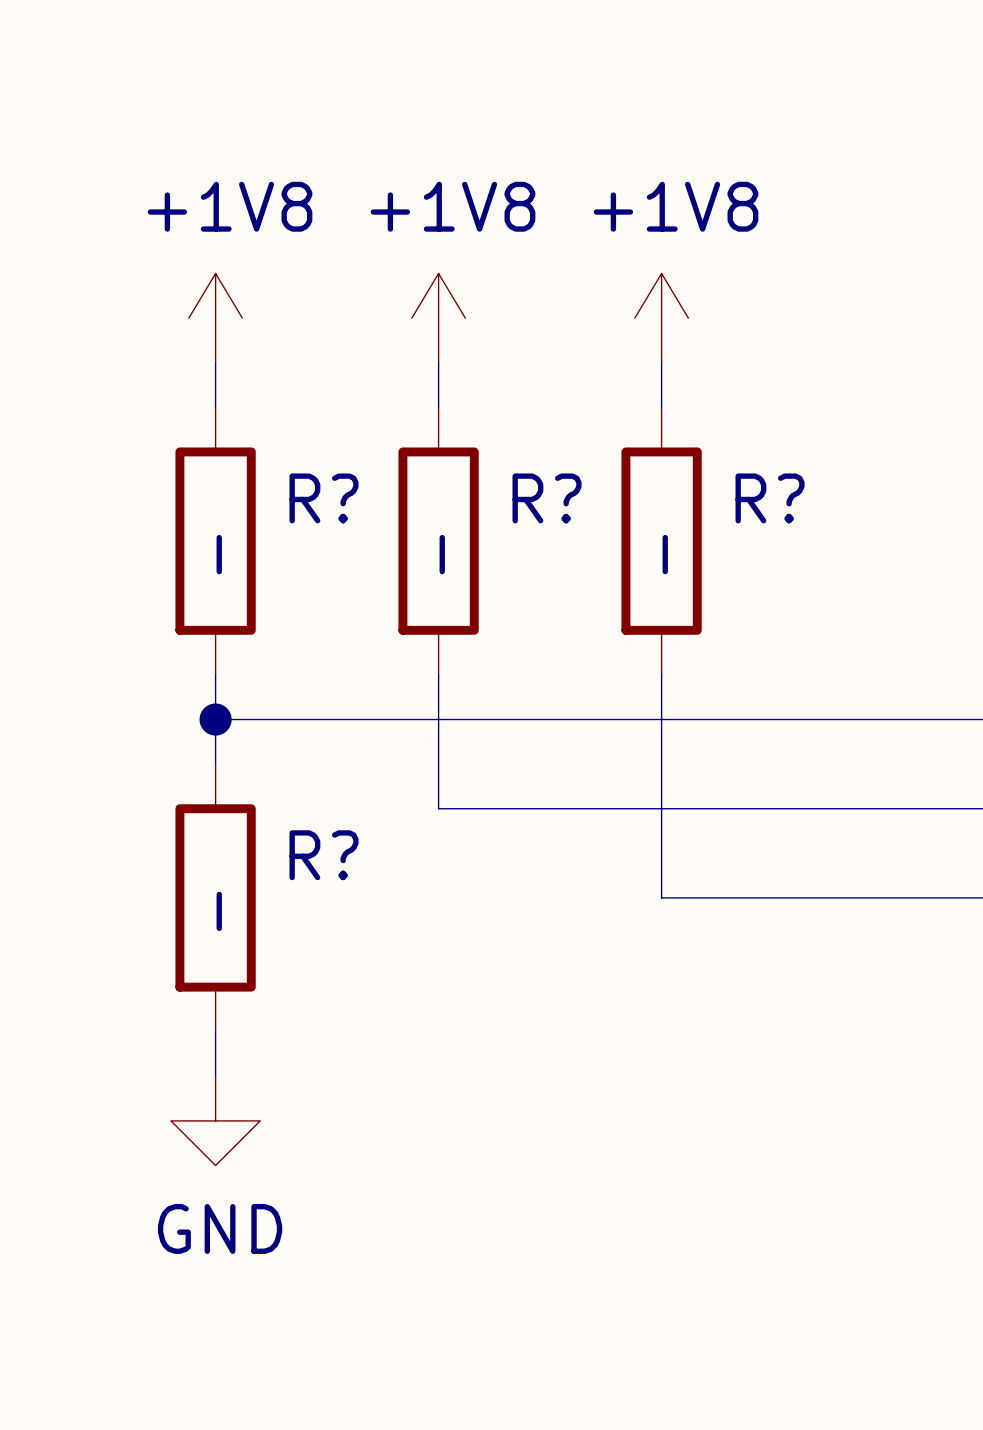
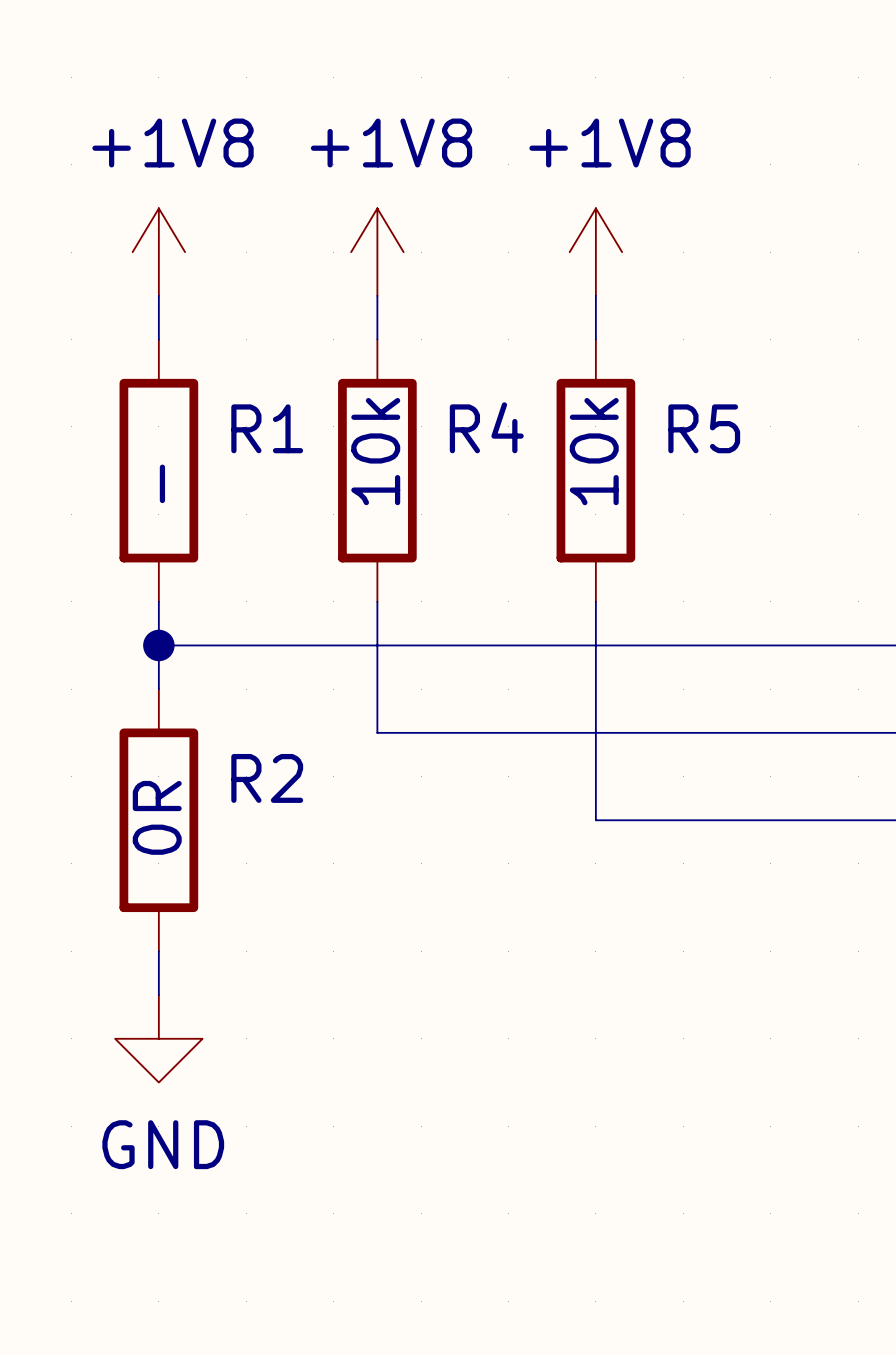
R? name: R? (324, 498) -> R1 (267, 428)
R? name: R? (547, 498) -> R4 (486, 427)
R? name: R? (770, 498) -> R5 (704, 428)
R? value: - (442, 554) -> 10k (375, 451)
R? value: - (665, 554) -> 10k (594, 451)
R? name: R? (324, 855) -> R2 (267, 778)
R? value: - (219, 911) -> 0R (157, 817)

